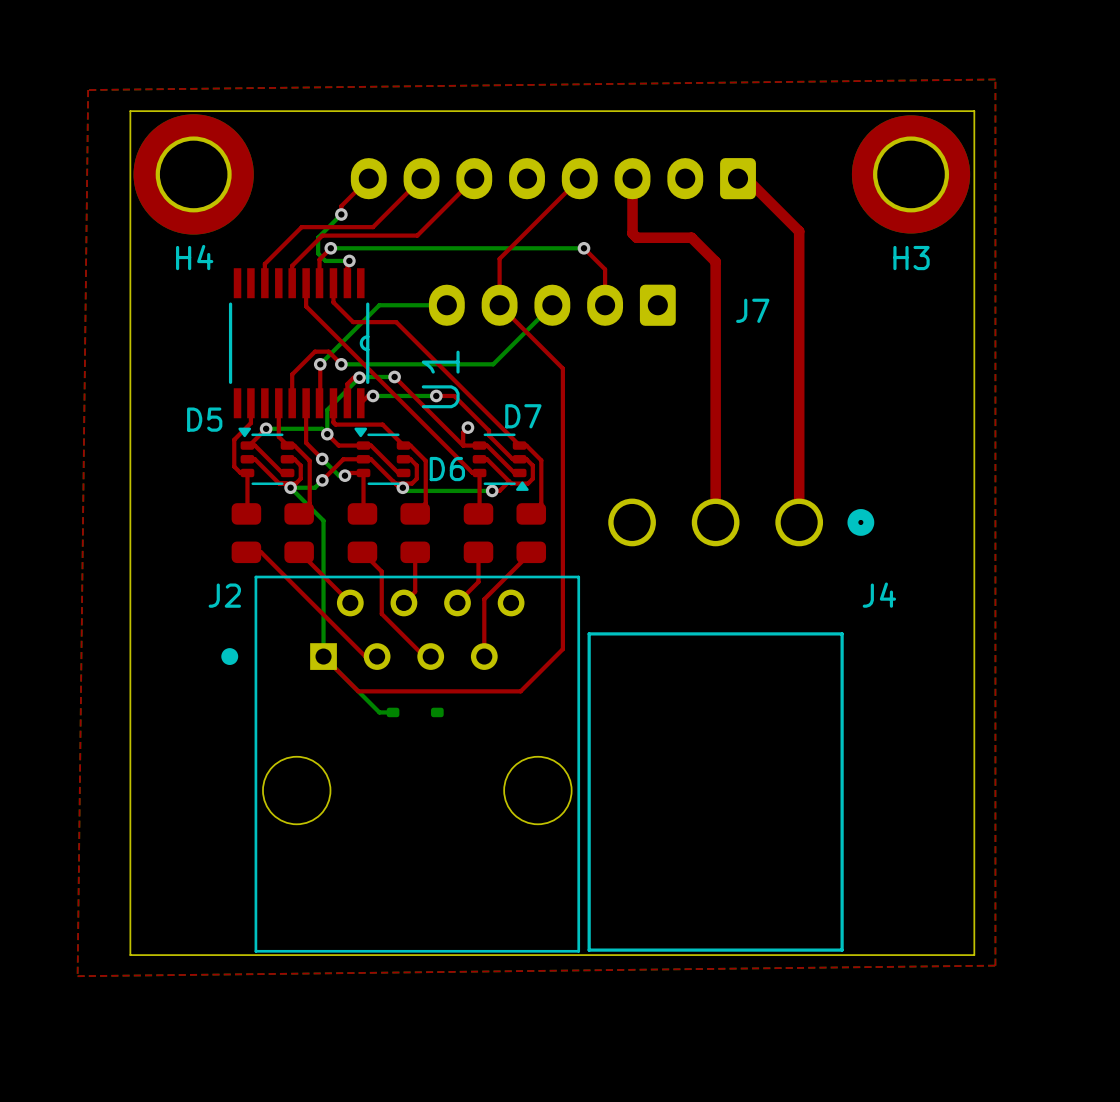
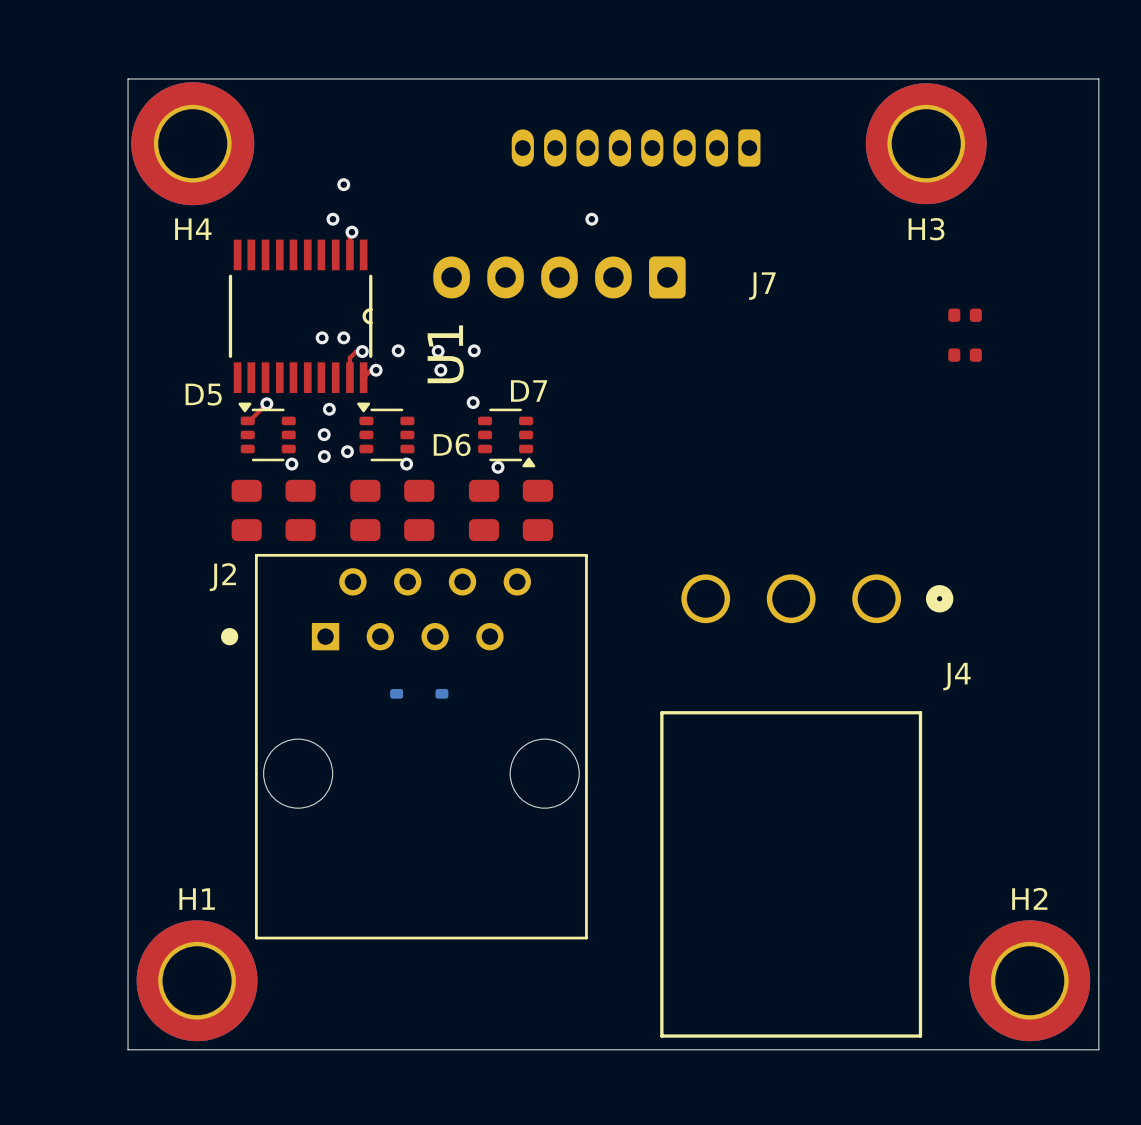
top zone outline: (995, 79) (995, 965) (77, 976) (88, 90) (995, 79) -> none
board edge: (974, 111) (974, 955) (130, 955) -> (990, 78) (1098, 78) (1098, 1049) (128, 1049) (128, 941)
top track: (368, 178) (341, 206) (341, 214) -> none
top track: (421, 178) (373, 227) (301, 227) (264, 263) (264, 283) -> none
top track: (474, 178) (417, 235) (322, 235) (292, 265) (292, 283) -> none
part: (553, 178) -> none
top track: (579, 178) (499, 258) (499, 305) (562, 368) (562, 649) (520, 691) (358, 691) (323, 656) -> none
part: none -> (636, 148)
top track: (632, 178) (632, 233) (636, 237) (691, 237) (715, 261) (715, 522) -> none
top track: (738, 178) (746, 178) (799, 231) (799, 522) -> none
bottom track: (341, 214) (318, 237) (318, 253) (325, 260) (349, 260) -> none
top track: (330, 248) (319, 259) (319, 283) -> none
bottom track: (330, 248) (583, 248) -> none
top track: (583, 248) (605, 269) (605, 305) -> none
top track: (306, 283) (306, 306) (472, 472) (479, 472) (478, 513) -> none
top track: (333, 283) (333, 302) (353, 322) (396, 322) (519, 445) (526, 445) (541, 460) (541, 503) (531, 513) -> none
bottom track: (446, 305) (379, 305) (320, 364) -> none
bottom track: (552, 305) (493, 364) (341, 364) -> none
part: none -> (965, 315)
top track: (320, 364) (319, 403) -> none
top track: (341, 364) (328, 351) (315, 351) (292, 374) (292, 403) -> none
top track: (394, 376) (463, 445) -> none
bottom track: (394, 376) (360, 376) (327, 409) (327, 434) (321, 428) (266, 428) -> none
via: none -> (474, 350)
via: none -> (438, 351)
part: none -> (965, 355)
bottom track: (373, 395) (436, 395) -> none
top track: (436, 395) (454, 395) (489, 430) (489, 435) (512, 459) (526, 459) (532, 465) (532, 478) (528, 483) (511, 483) (487, 459) (479, 459) -> none
top track: (250, 403) (250, 423) (234, 439) (234, 466) (240, 472) (247, 472) (246, 513) -> none
top track: (278, 403) (278, 436) (287, 445) (294, 445) (309, 460) (309, 503) (299, 513) -> none
top track: (306, 403) (306, 442) (322, 458) -> none
top track: (333, 403) (333, 422) (335, 424) (382, 424) (403, 445) (410, 445) (425, 460) (425, 503) (415, 513) -> none
top track: (467, 427) (463, 432) (463, 445) -> none
top track: (327, 434) (338, 445) (371, 445) (398, 472) (403, 472) -> none
top track: (247, 445) (254, 445) (282, 472) (287, 472) -> none
top track: (463, 445) (487, 445) (514, 472) (519, 472) -> none
bottom track: (322, 458) (338, 475) (344, 475) -> none
top track: (247, 459) (254, 459) (279, 483) (295, 483) (300, 478) (300, 465) (294, 459) (287, 459) -> none
top track: (403, 459) (410, 459) (416, 465) (416, 478) (412, 483) (395, 483) -> none
top track: (344, 475) (347, 472) (363, 472) (362, 513) -> none
top track: (322, 480) (343, 459) (371, 459) (399, 487) (402, 487) -> none
bottom track: (322, 480) (314, 487) (290, 487) (323, 520) (323, 656) (379, 712) (393, 712) -> none
top track: (509, 481) (499, 490) (492, 490) -> none
bottom track: (402, 487) (406, 490) (492, 490) -> none
top track: (246, 552) (261, 552) (365, 656) (377, 656) -> none
top track: (299, 552) (350, 602) -> none
top track: (362, 552) (381, 571) (381, 613) (424, 656) (430, 656) -> none
top track: (415, 552) (415, 591) (403, 602) -> none
top track: (478, 552) (478, 581) (457, 602) -> none
top track: (531, 552) (484, 599) (484, 656) -> none
J4 position: (730, 725) -> (806, 806)
H1: none -> (197, 980)
H2: none -> (1029, 980)

